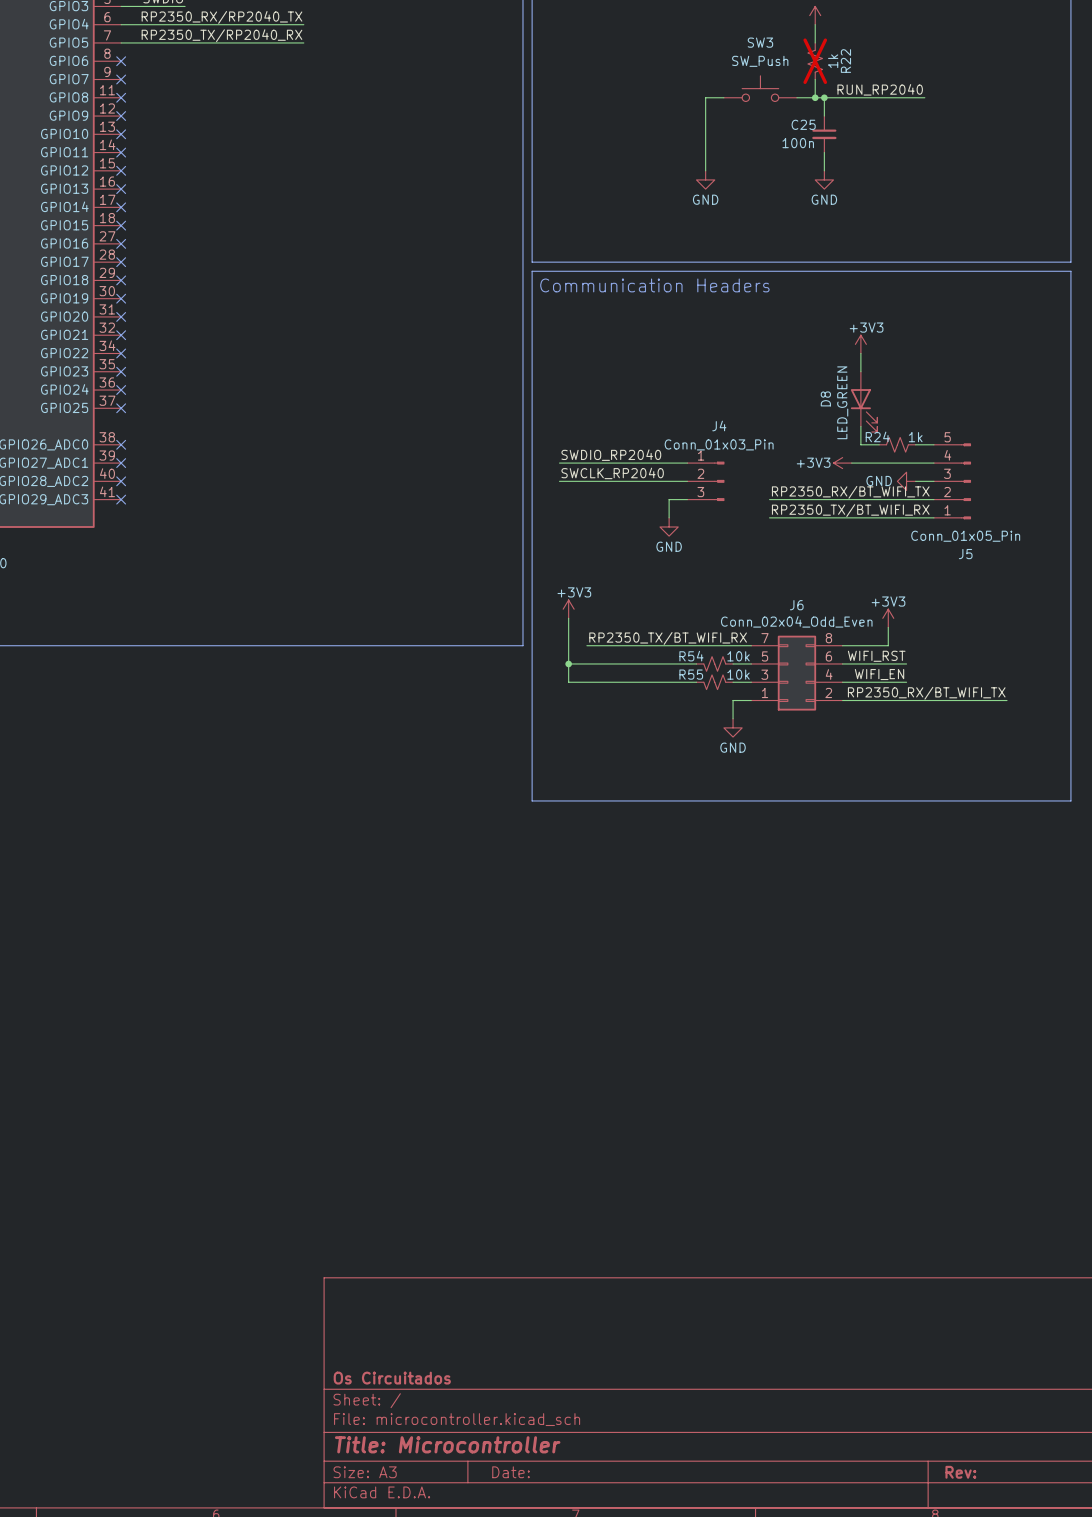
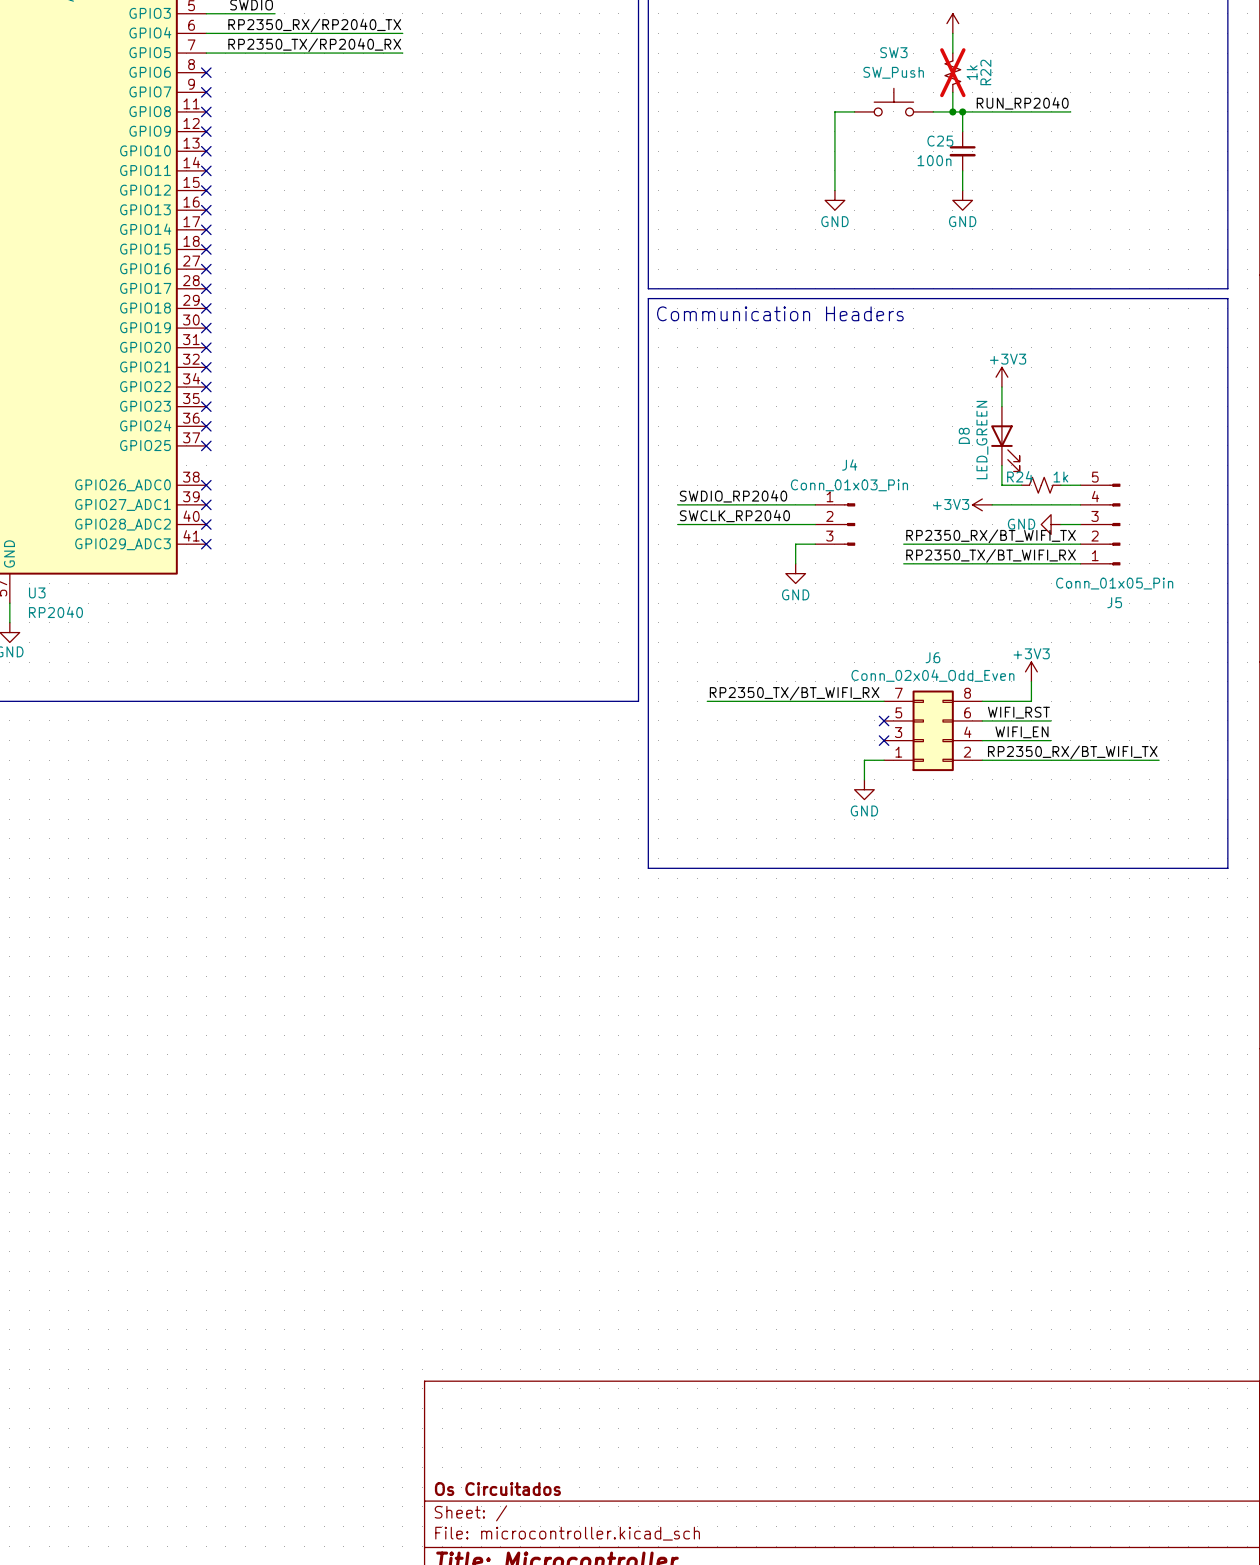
power symbol: +3V3 (568, 609) -> none
wire: (568, 618) (568, 682) (696, 682) -> none
wire: (568, 663) (696, 663) -> none
junction: (568, 663) -> none
R54: 10k (714, 663) -> none
wire: (733, 663) (751, 663) -> none
no-connect mark: none -> (884, 720)
R55: 10k (714, 682) -> none
wire: (733, 682) (751, 682) -> none
no-connect mark: none -> (884, 740)

